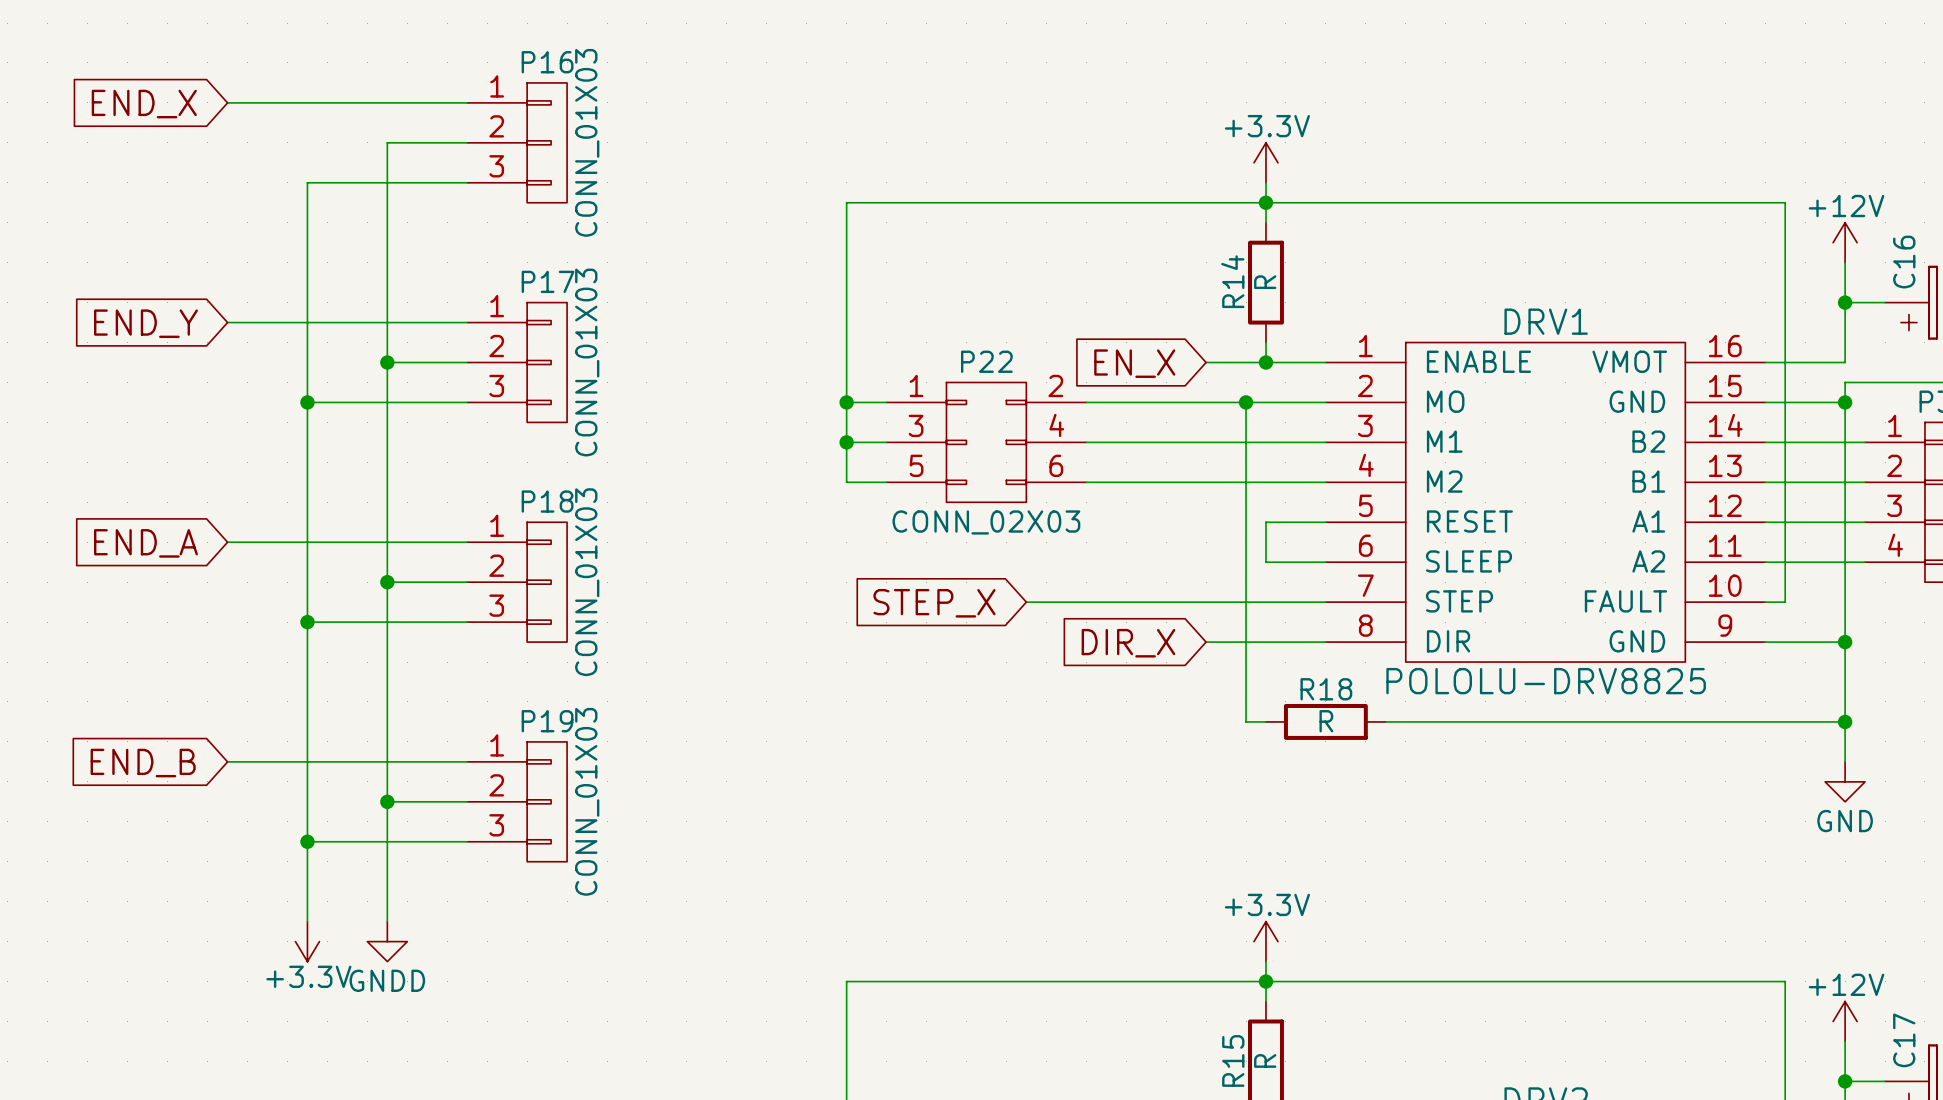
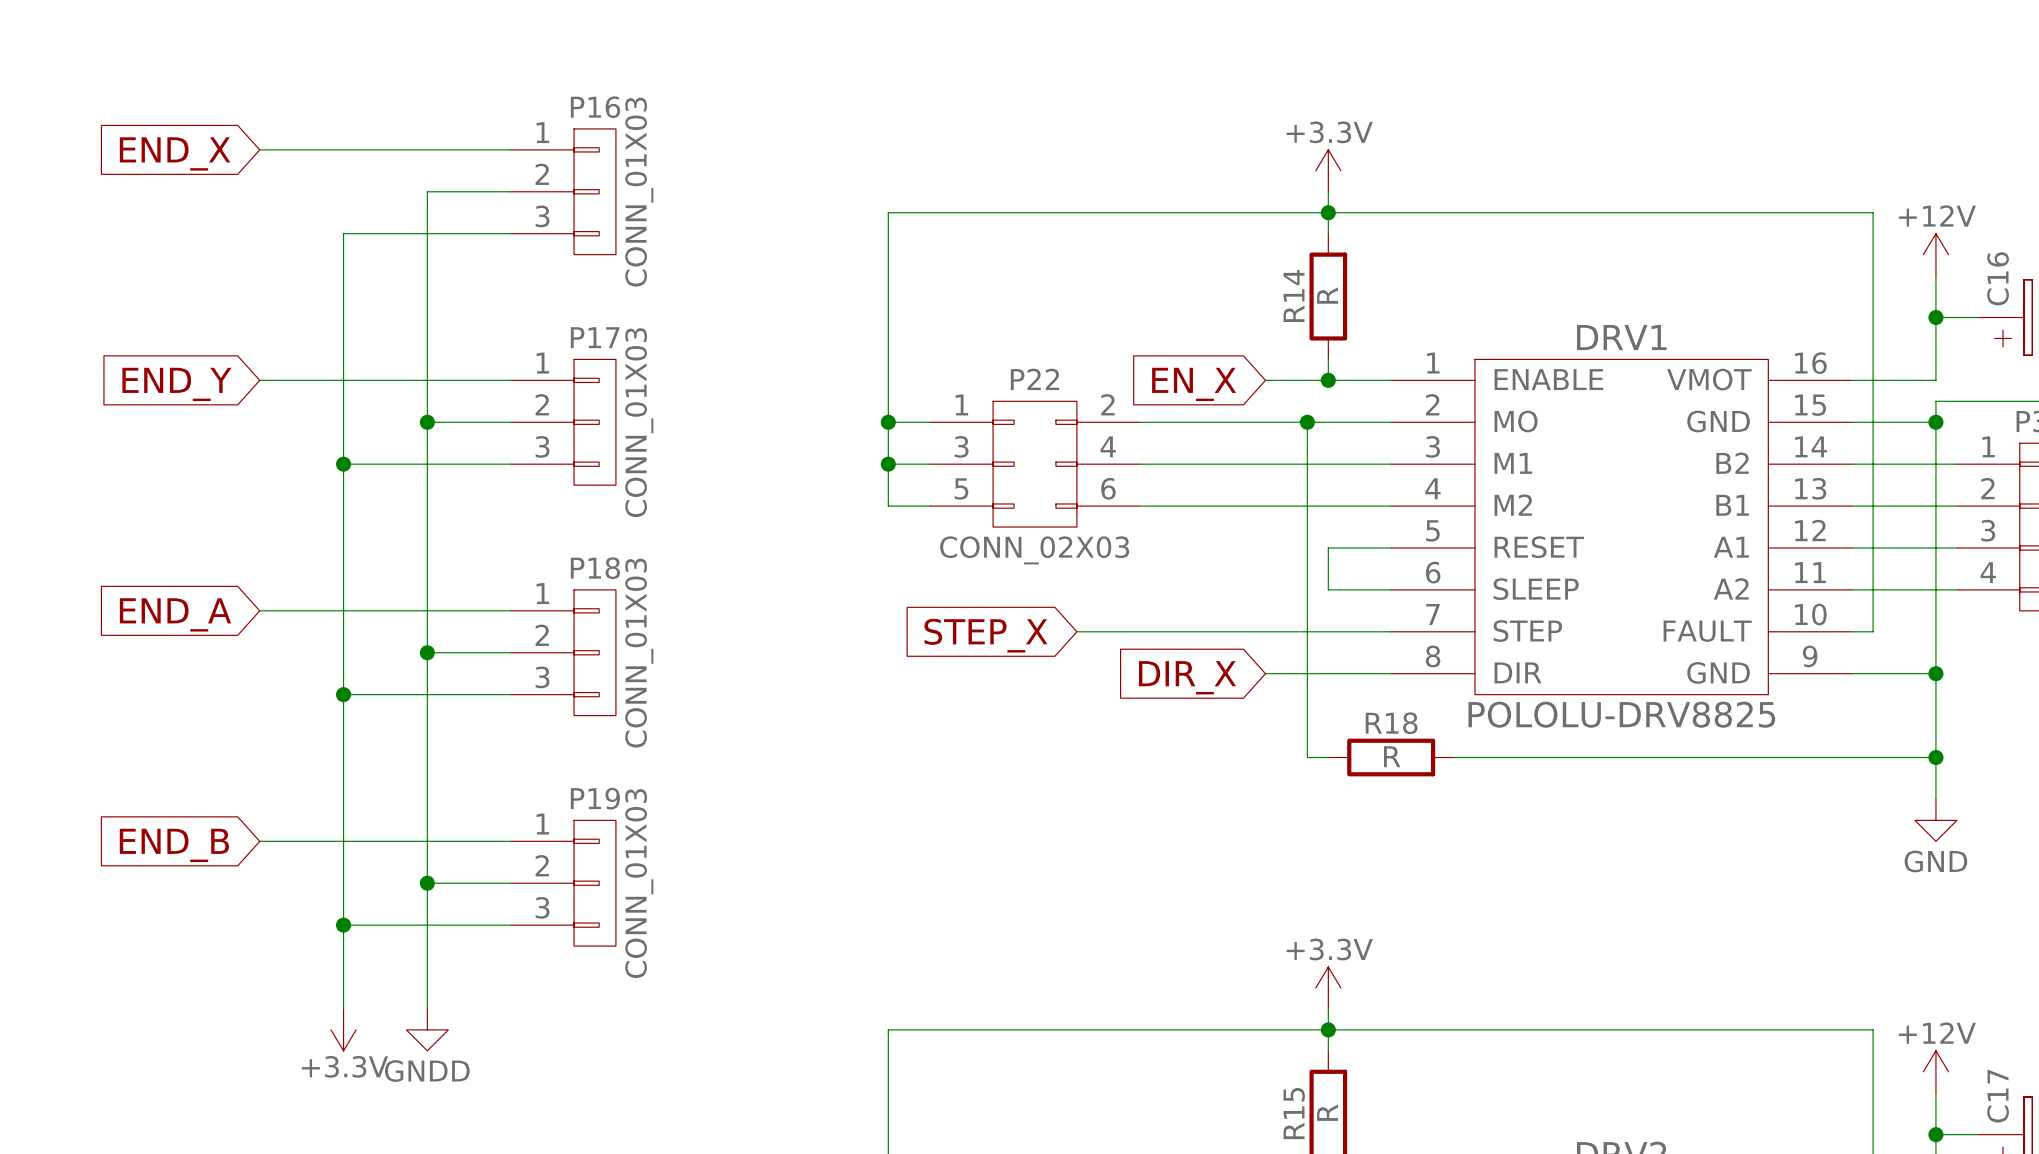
wire: (227, 102) (467, 102) -> none
global label position: END_X (144, 104) -> END_X (175, 153)
wire: (387, 142) (387, 921) -> (406, 149) (259, 149)
P16 position: (517, 142) -> (563, 191)
wire: (407, 182) (307, 182) (307, 921) -> (427, 191) (427, 1008)
wire: none -> (511, 233) (343, 233) (343, 1008)
wire: (227, 322) (467, 322) -> none
global label position: END_Y (145, 323) -> END_Y (176, 384)
wire: none -> (259, 380) (406, 380)
junction position: (387, 362) -> (427, 422)
P17 position: (517, 362) -> (563, 422)
wire: (307, 402) (407, 402) -> none
junction position: (307, 402) -> (343, 464)
wire: none -> (343, 464) (511, 464)
wire: (227, 542) (467, 542) -> none
global label position: END_A (145, 543) -> END_A (175, 614)
wire: none -> (259, 610) (406, 610)
junction position: (387, 582) -> (427, 652)
P18 position: (517, 582) -> (563, 652)
wire: (307, 622) (407, 622) -> none
junction position: (307, 622) -> (343, 694)
wire: none -> (343, 694) (511, 694)
wire: (227, 761) (467, 761) -> none
global label position: END_B (143, 763) -> END_B (174, 845)
wire: none -> (259, 841) (406, 841)
junction position: (387, 801) -> (427, 883)
P19 position: (517, 801) -> (563, 883)
wire: (307, 841) (407, 841) -> none
junction position: (307, 841) -> (343, 925)
wire: none -> (343, 925) (511, 925)
power symbol position: +3.3V (307, 941) -> +3.3V (343, 1029)
power symbol position: GNDD (387, 941) -> GNDD (427, 1029)

